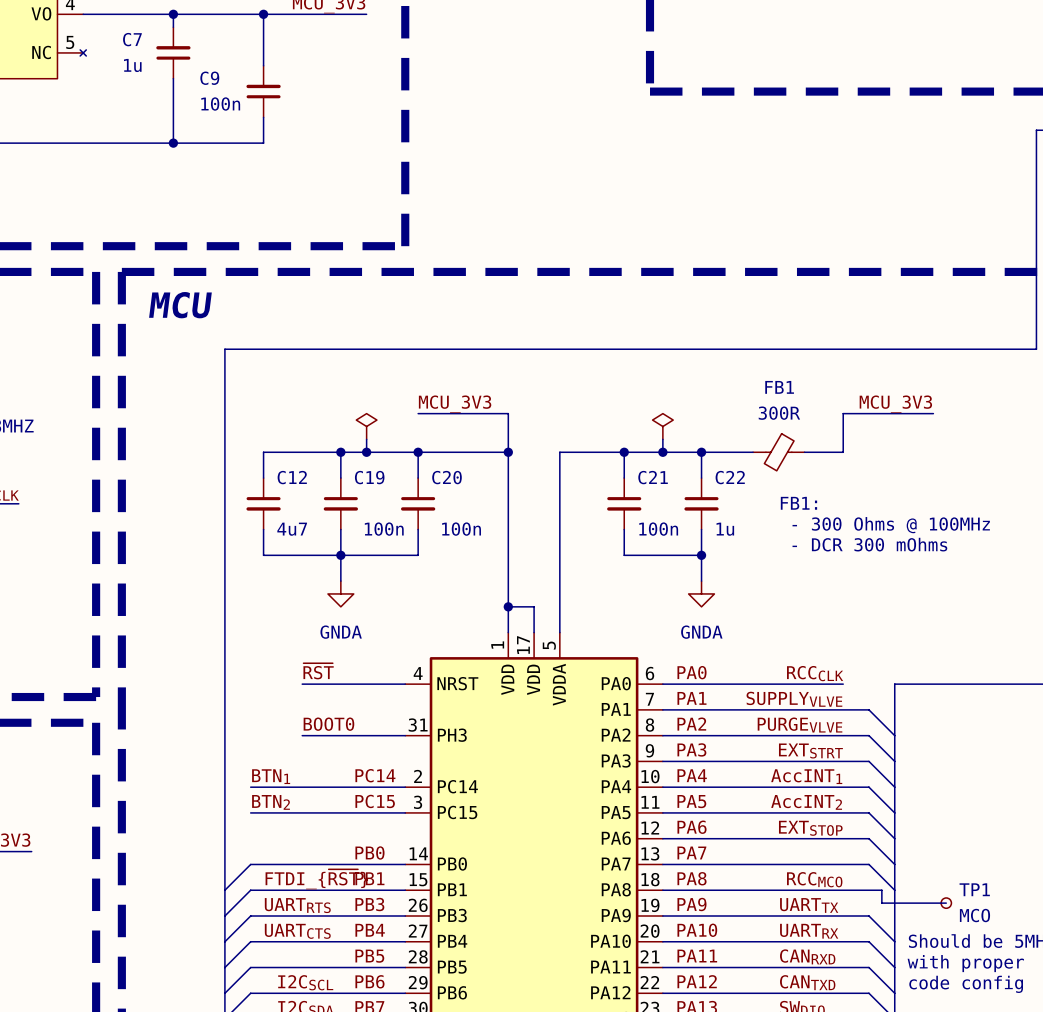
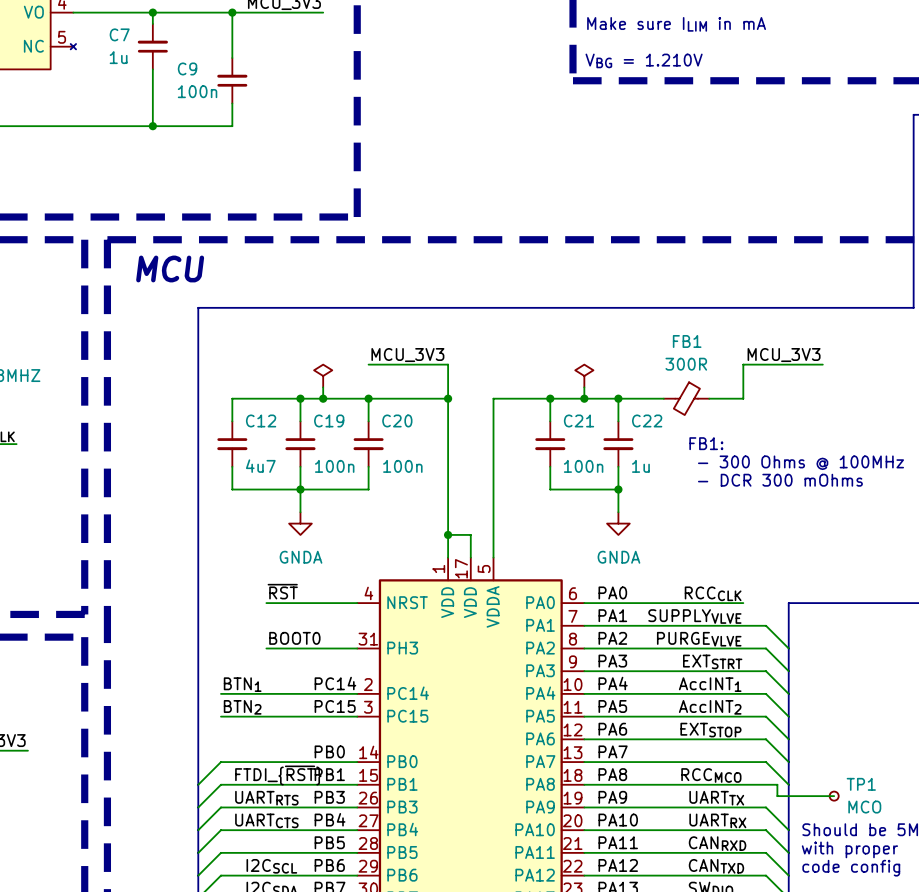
text: none -> Make sure ILIM in mA (676, 24)
text: none -> VBG = 1.210V (644, 60)

